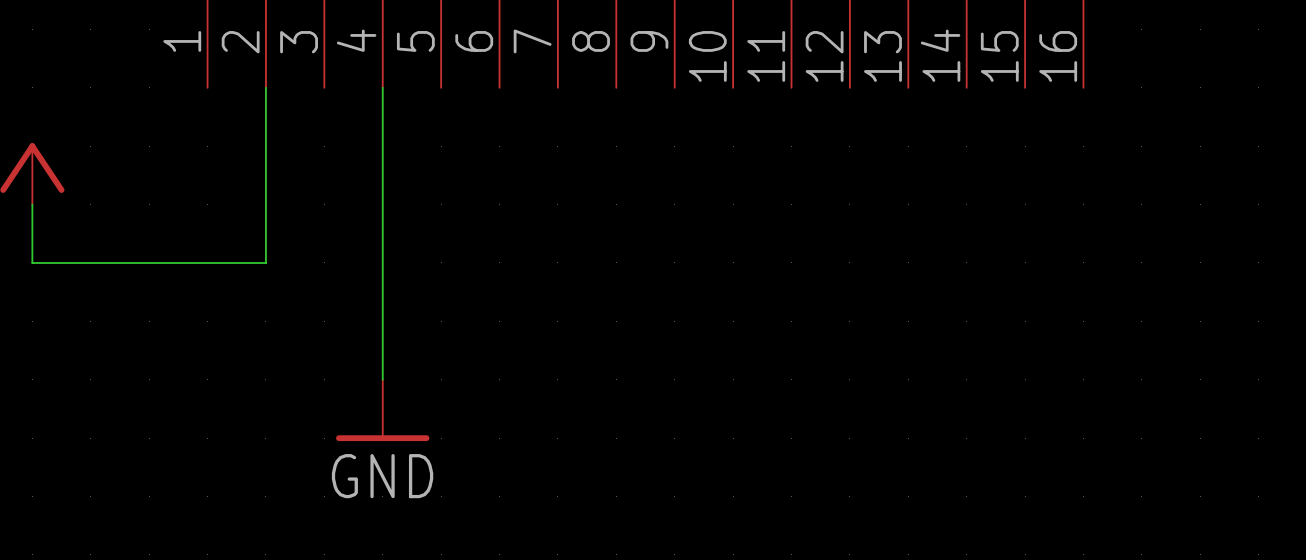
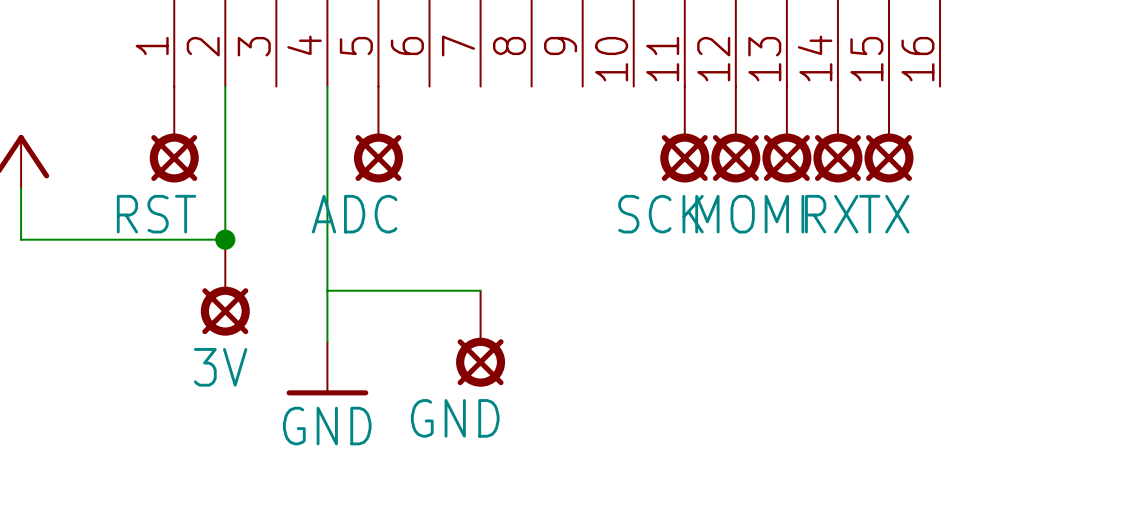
RST: none -> (174, 134)
ADC: none -> (378, 134)
SCK: none -> (684, 134)
MO: none -> (735, 134)
MI: none -> (786, 134)
RX: none -> (837, 134)
TX: none -> (888, 134)
junction: none -> (225, 239)
3V: none -> (225, 287)
wire: none -> (327, 290) (480, 290)
GND: none -> (480, 338)

